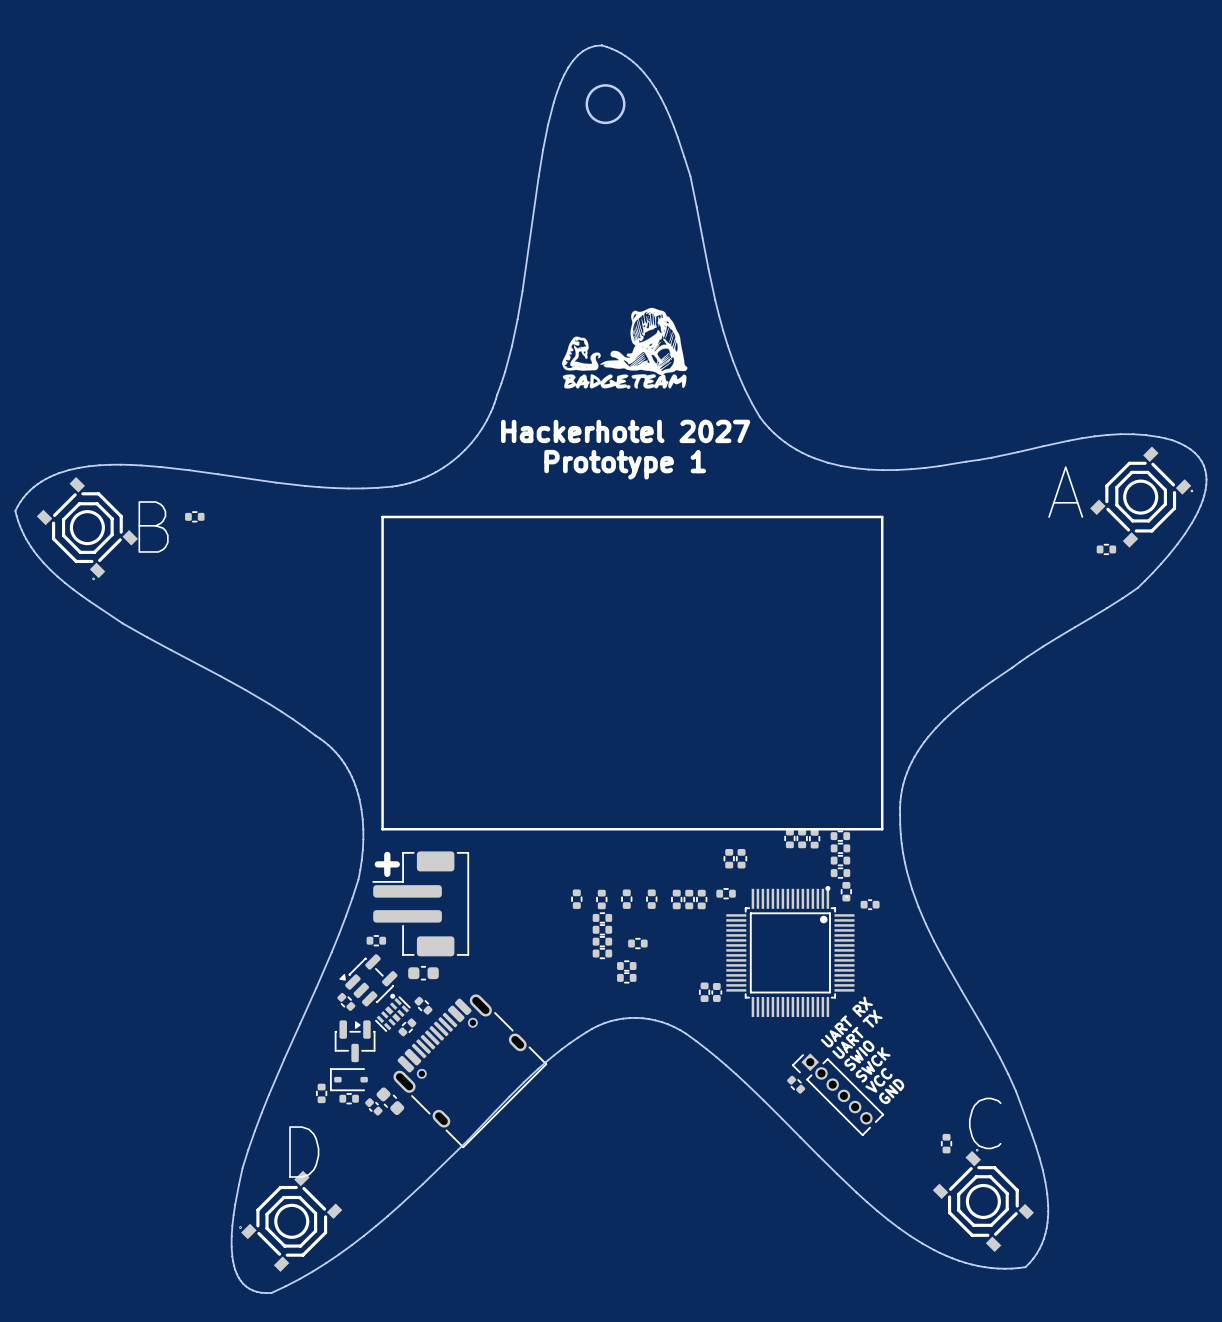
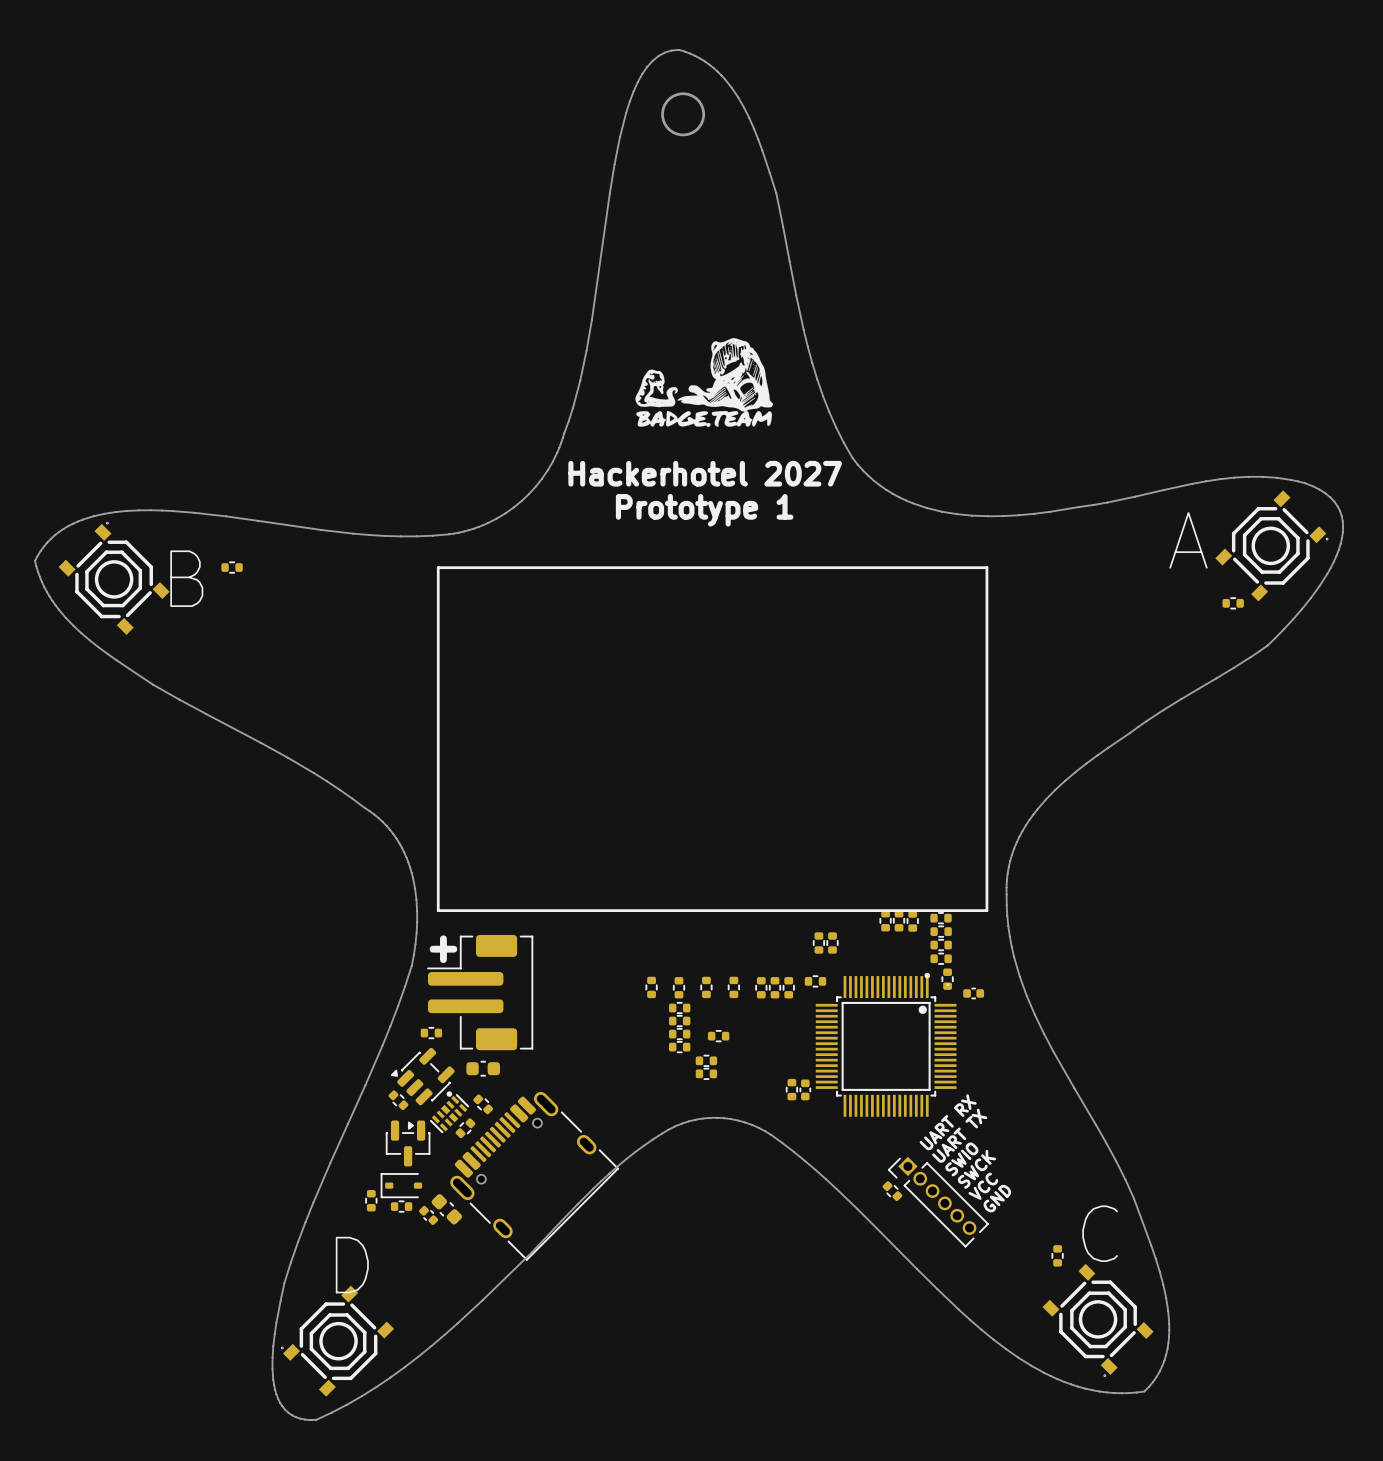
part rotation: 0° (87, 528) -> 180° (114, 578)
part rotation: 0° (983, 1200) -> 180° (1098, 1320)

